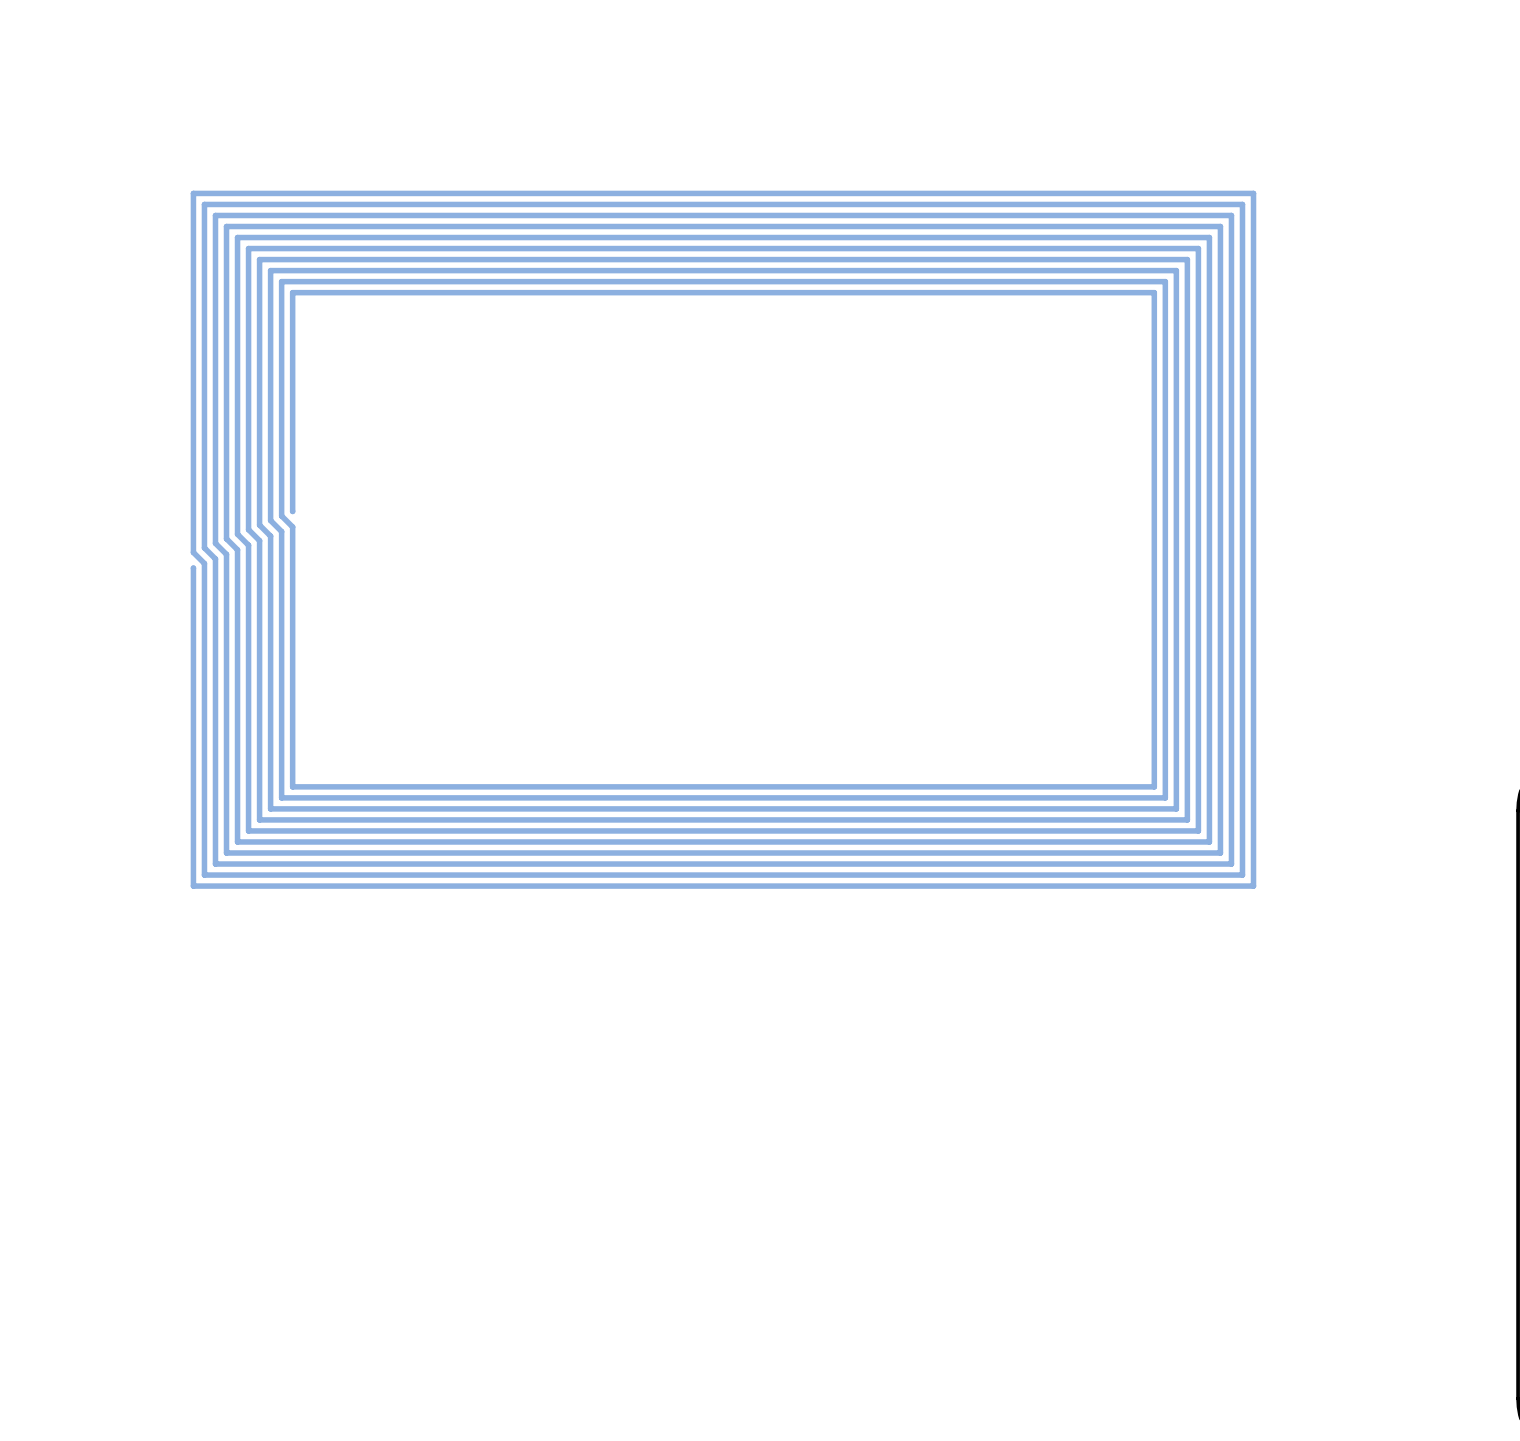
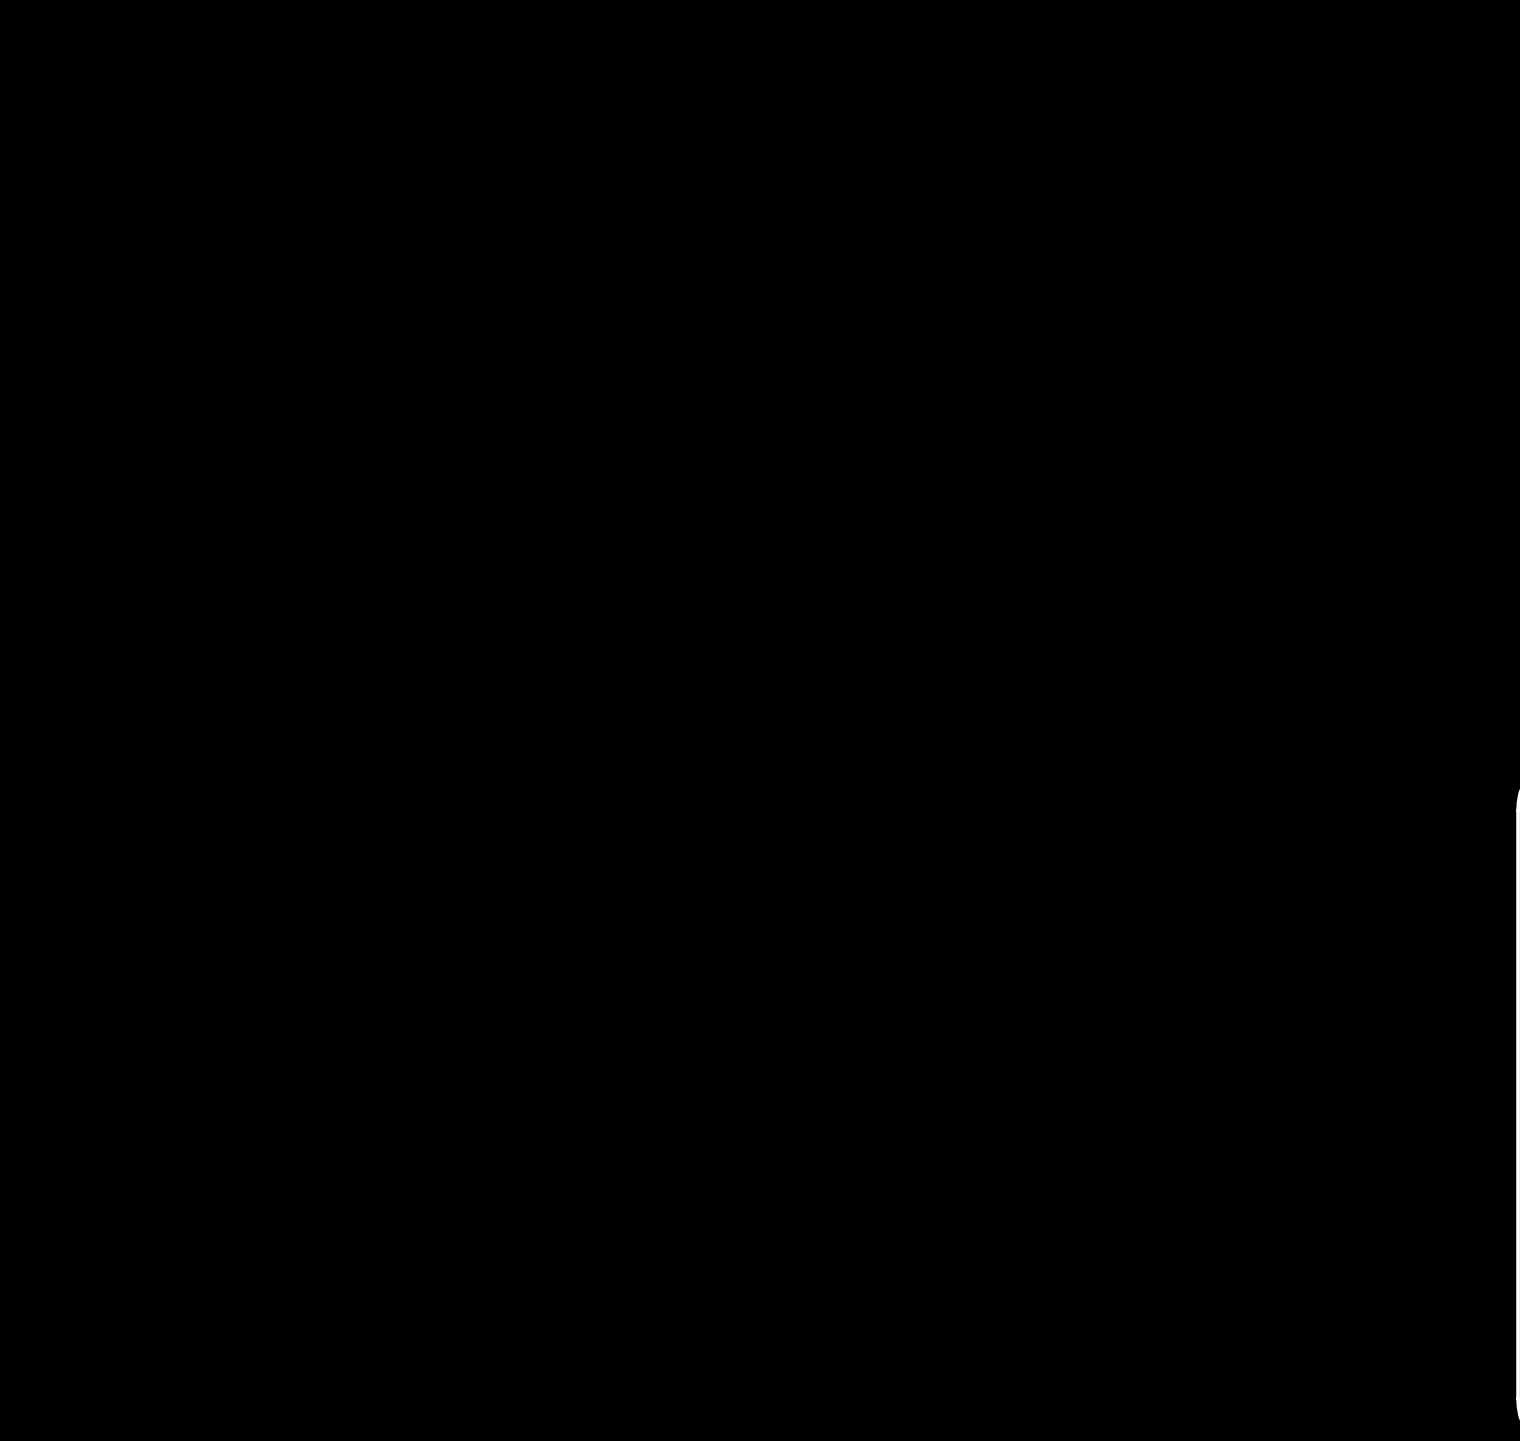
part: (723, 539) -> none

